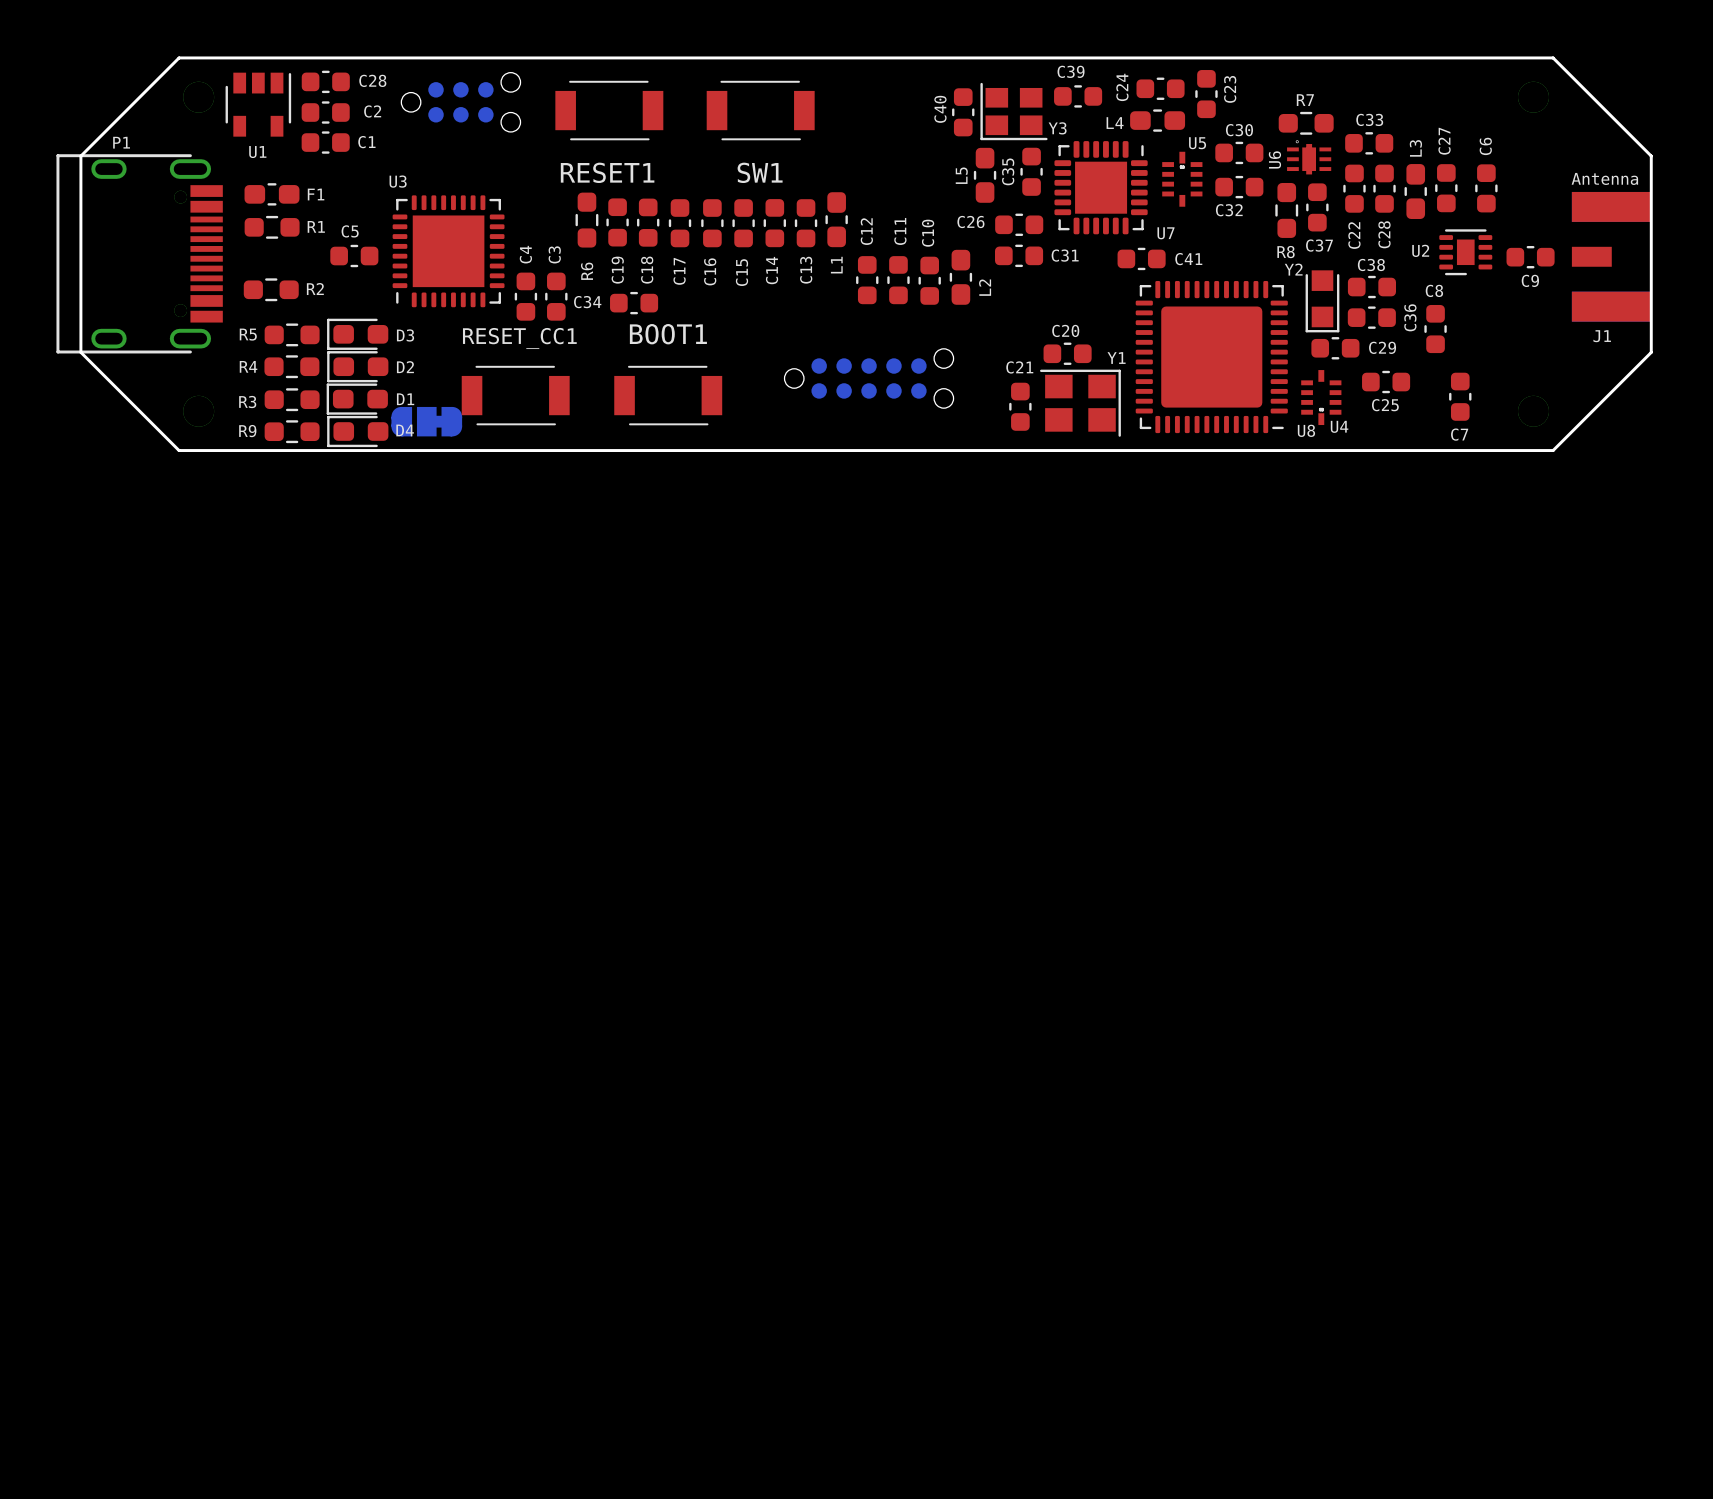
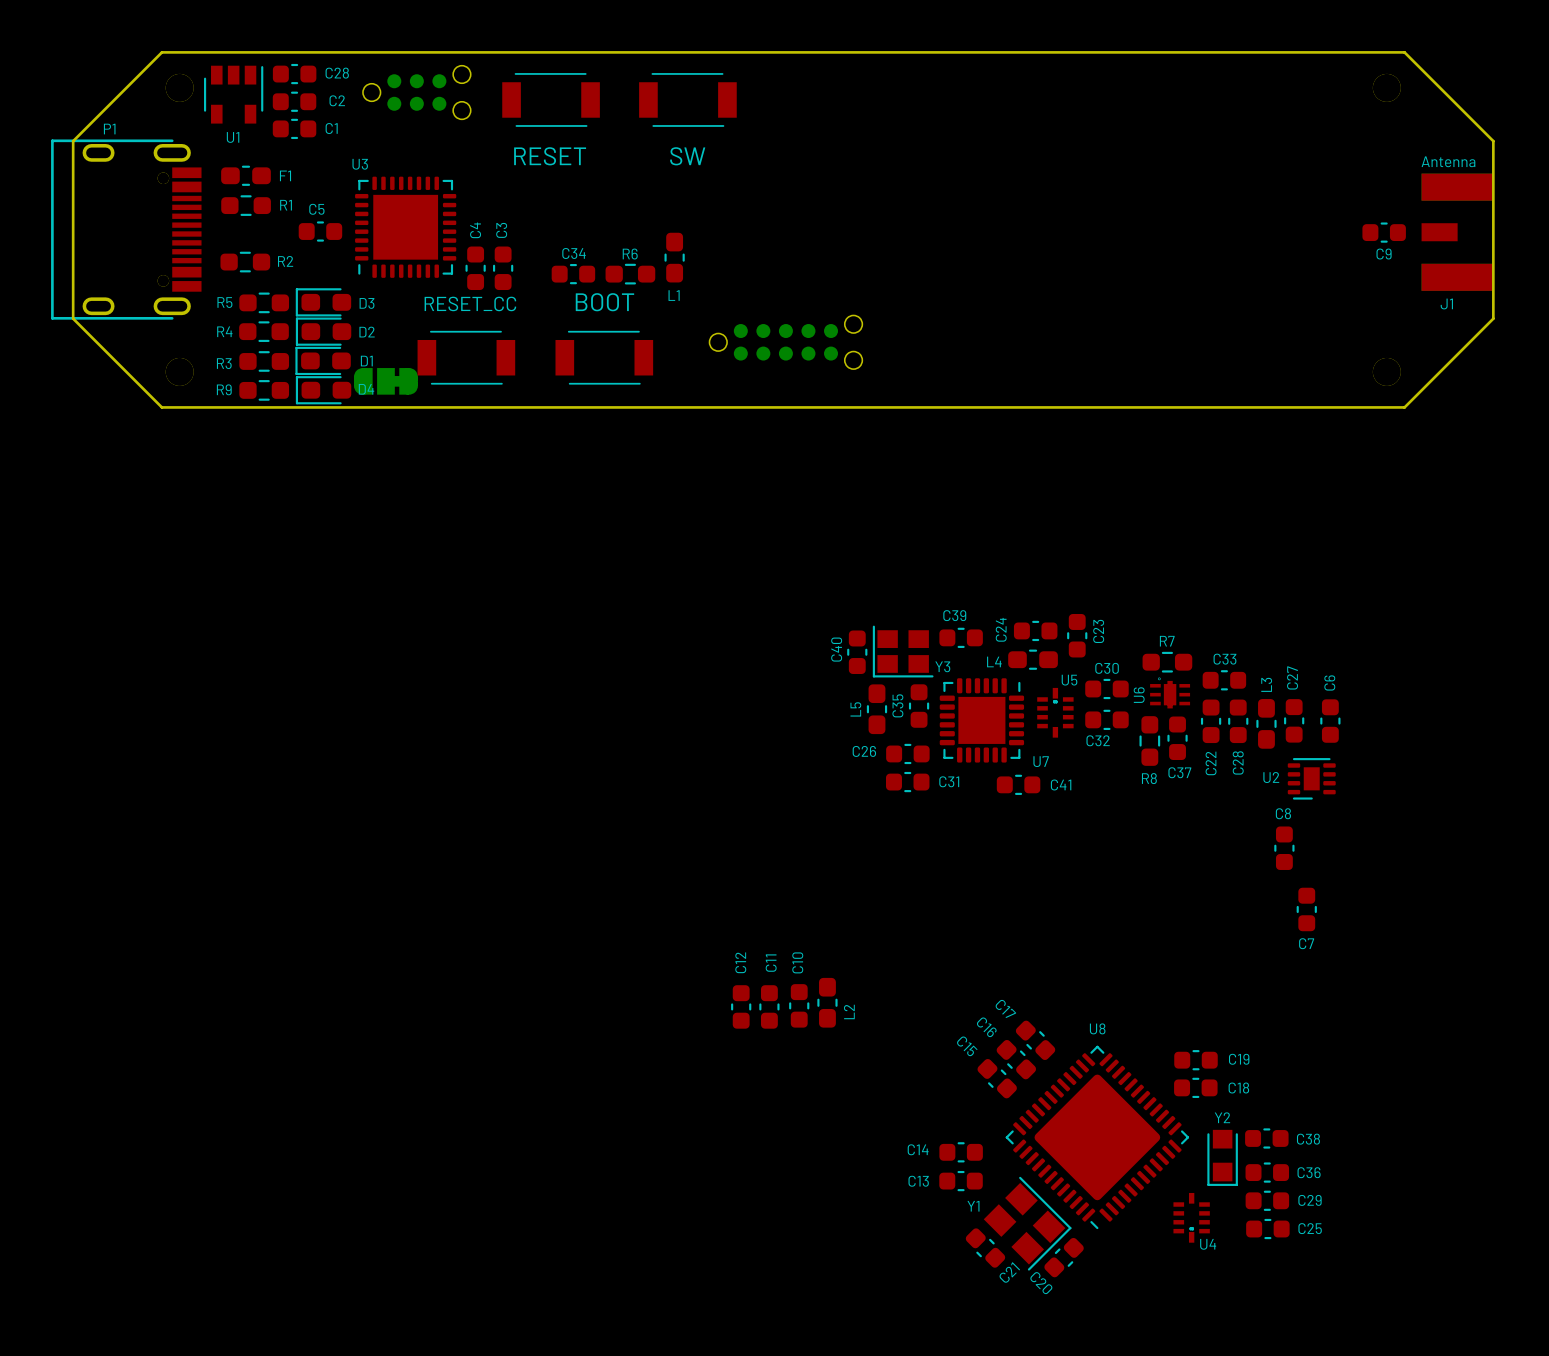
C24 position: (1160, 88) -> (1035, 630)
C23 position: (1206, 94) -> (1077, 635)
C39 position: (1078, 96) -> (961, 637)
Y3 position: (1014, 111) -> (903, 651)
C40 position: (963, 112) -> (857, 652)
L4 position: (1157, 120) -> (1033, 659)
R7 position: (1306, 123) -> (1167, 662)
C33 position: (1369, 143) -> (1224, 680)
C30 position: (1239, 152) -> (1106, 688)
U6 position: (1309, 157) -> (1170, 692)
C35 position: (1031, 171) -> (919, 706)
RESET1 name: RESET1 (607, 172) -> RESET (550, 156)
SW1 name: SW1 (760, 172) -> SW (687, 156)
L5 position: (985, 175) -> (876, 709)
U5 position: (1182, 179) -> (1055, 712)
U7 position: (1101, 187) -> (981, 720)
C32 position: (1239, 187) -> (1106, 719)
C22 position: (1354, 188) -> (1211, 721)
C28: (1384, 188) -> none
C27 position: (1446, 188) -> (1294, 720)
C6 position: (1486, 188) -> (1330, 721)
L3 position: (1415, 191) -> (1266, 723)
C37 position: (1317, 207) -> (1177, 738)
R8 position: (1286, 210) -> (1149, 741)
L1 position: (836, 219) -> (674, 257)
R6 rotation: 0° (586, 220) -> 90° clockwise (630, 274)
R6 position: (586, 220) -> (630, 274)
C19 rotation: 0° (617, 222) -> 90° clockwise (1195, 1060)
C19 position: (617, 222) -> (1195, 1060)
C18 rotation: 0° (648, 222) -> 90° clockwise (1195, 1087)
C18 position: (648, 222) -> (1195, 1087)
C17 rotation: 0° (680, 223) -> 45° counterclockwise (1035, 1040)
C17 position: (680, 223) -> (1035, 1040)
C16 rotation: 0° (712, 223) -> 45° counterclockwise (1016, 1059)
C16 position: (712, 223) -> (1016, 1059)
C15 rotation: 0° (743, 223) -> 45° counterclockwise (997, 1078)
C15 position: (743, 223) -> (997, 1078)
C14 rotation: 0° (774, 223) -> 90° clockwise (961, 1152)
C14 position: (774, 223) -> (961, 1152)
C13 rotation: 0° (806, 223) -> 90° clockwise (961, 1181)
C13 position: (806, 223) -> (961, 1181)
C26 position: (1019, 224) -> (907, 753)
U2 position: (1465, 252) -> (1311, 778)
C31 position: (1019, 255) -> (907, 782)
C41 position: (1141, 258) -> (1018, 784)
C38 name position: C38 (1371, 264) -> C38 (1308, 1139)
L1 name rotation: 0° (836, 265) -> 90° clockwise (674, 295)
Y2 name position: Y2 (1293, 269) -> Y2 (1222, 1117)
C19 name position: C19 (617, 270) -> C19 (1239, 1059)
C18 name position: C18 (647, 270) -> C18 (1238, 1088)
R6 name position: R6 (587, 271) -> R6 (630, 254)
C17 name position: C17 (679, 271) -> C17 (1005, 1008)
C16 name position: C16 (710, 271) -> C16 (986, 1027)
C15 name position: C15 (741, 272) -> C15 (967, 1046)
L2 position: (960, 277) -> (827, 1002)
C12 position: (867, 280) -> (741, 1006)
C11 position: (898, 280) -> (769, 1006)
C10 position: (929, 280) -> (799, 1005)
C38 position: (1371, 287) -> (1266, 1138)
Y2 position: (1322, 301) -> (1222, 1157)
C34 name position: C34 (587, 302) -> C34 (574, 253)
C36 position: (1371, 317) -> (1267, 1172)
C36 name rotation: 0° (1410, 317) -> 90° clockwise (1309, 1172)
C8 position: (1435, 329) -> (1284, 848)
C20 name position: C20 (1065, 330) -> C20 (1041, 1283)
BOOT1 name: BOOT1 (668, 334) -> BOOT (604, 302)
RESET_CC1 name: RESET_CC1 (519, 338) -> RESET_CC (470, 303)
C29 position: (1335, 348) -> (1267, 1200)
C20 rotation: 0° (1067, 353) -> 45° counterclockwise (1064, 1257)
C20 position: (1067, 353) -> (1064, 1257)
U8 rotation: 0° (1211, 357) -> 45° clockwise (1097, 1137)
U8 position: (1211, 357) -> (1097, 1137)
Y1 name position: Y1 (1116, 358) -> Y1 (973, 1206)
C21 name position: C21 (1019, 367) -> C21 (1009, 1272)
C25 position: (1386, 382) -> (1267, 1229)
C7 position: (1460, 396) -> (1306, 909)
U4 position: (1321, 397) -> (1191, 1217)
Y1 rotation: 0° (1080, 403) -> 45° clockwise (1027, 1223)
Y1 position: (1080, 403) -> (1027, 1223)
C25 name position: C25 (1385, 405) -> C25 (1310, 1228)
C21 rotation: 0° (1020, 406) -> 45° counterclockwise (985, 1248)
C21 position: (1020, 406) -> (985, 1248)
U8 name position: U8 (1306, 430) -> U8 (1097, 1028)
C28: none -> (1238, 721)

